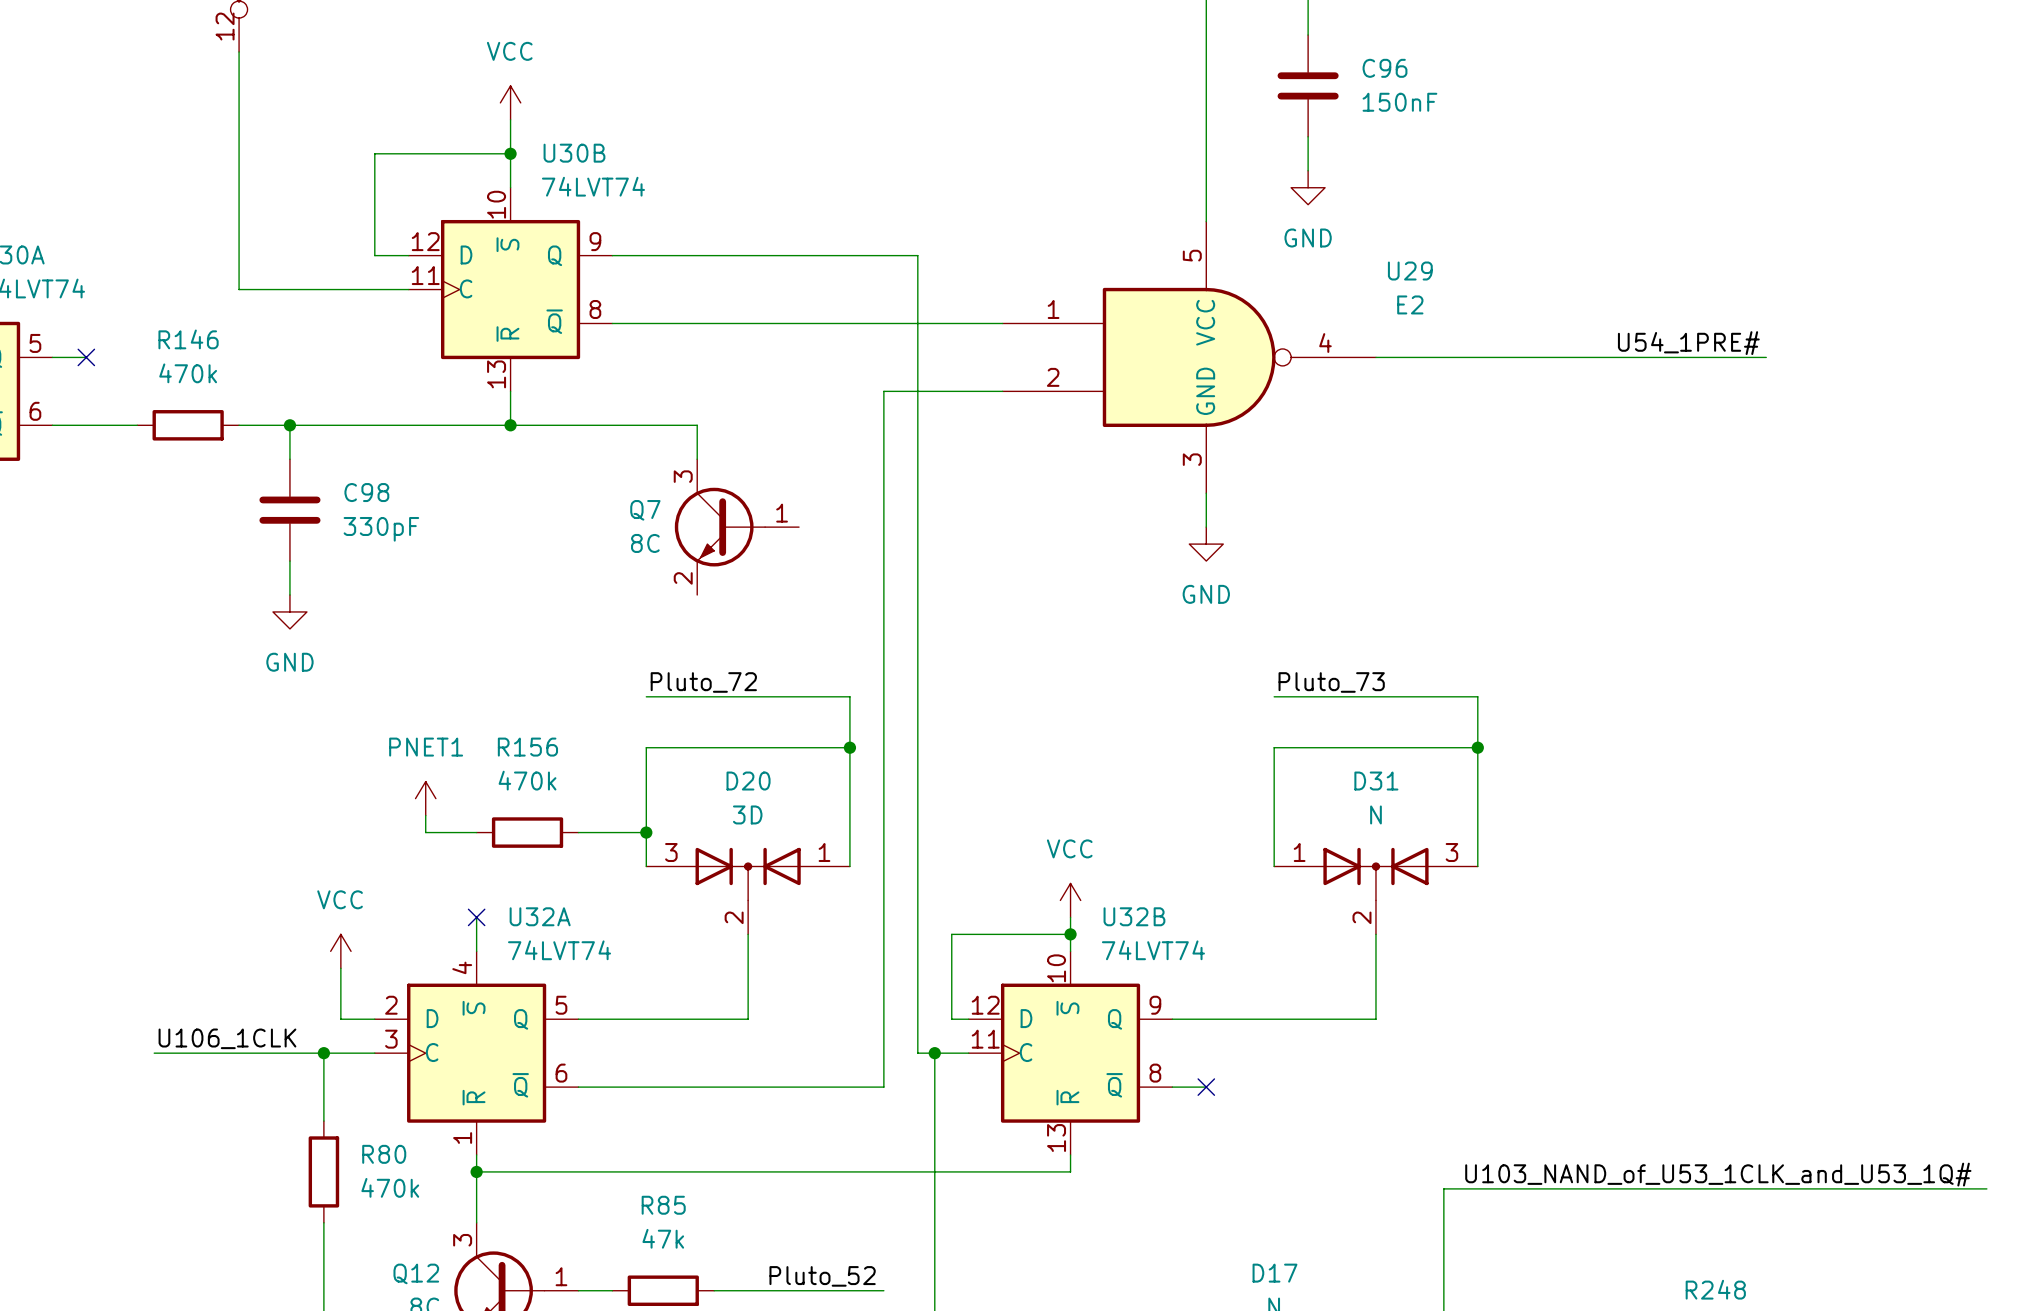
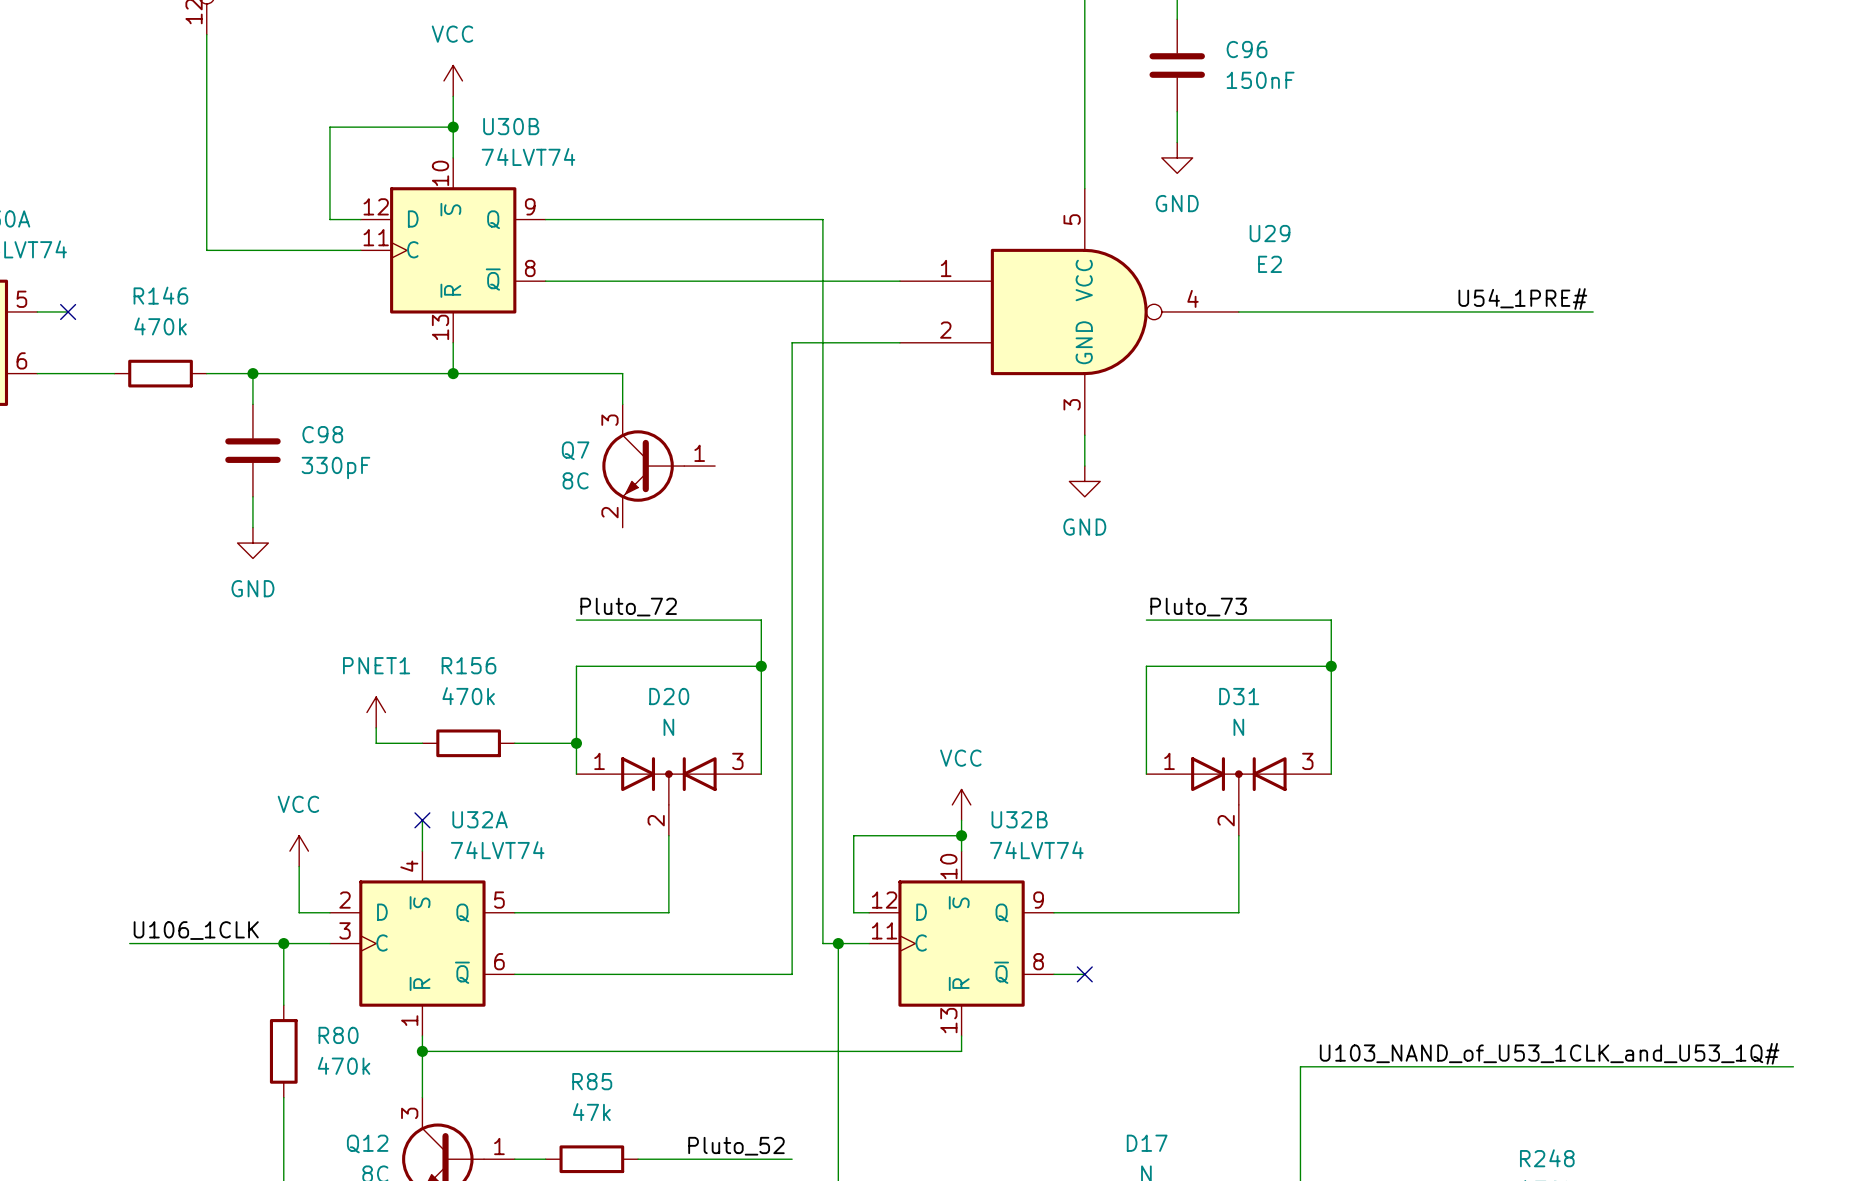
D20 value: 3D (747, 814) -> N (668, 727)
D20 flip: as is (748, 874) -> left-right (668, 781)

